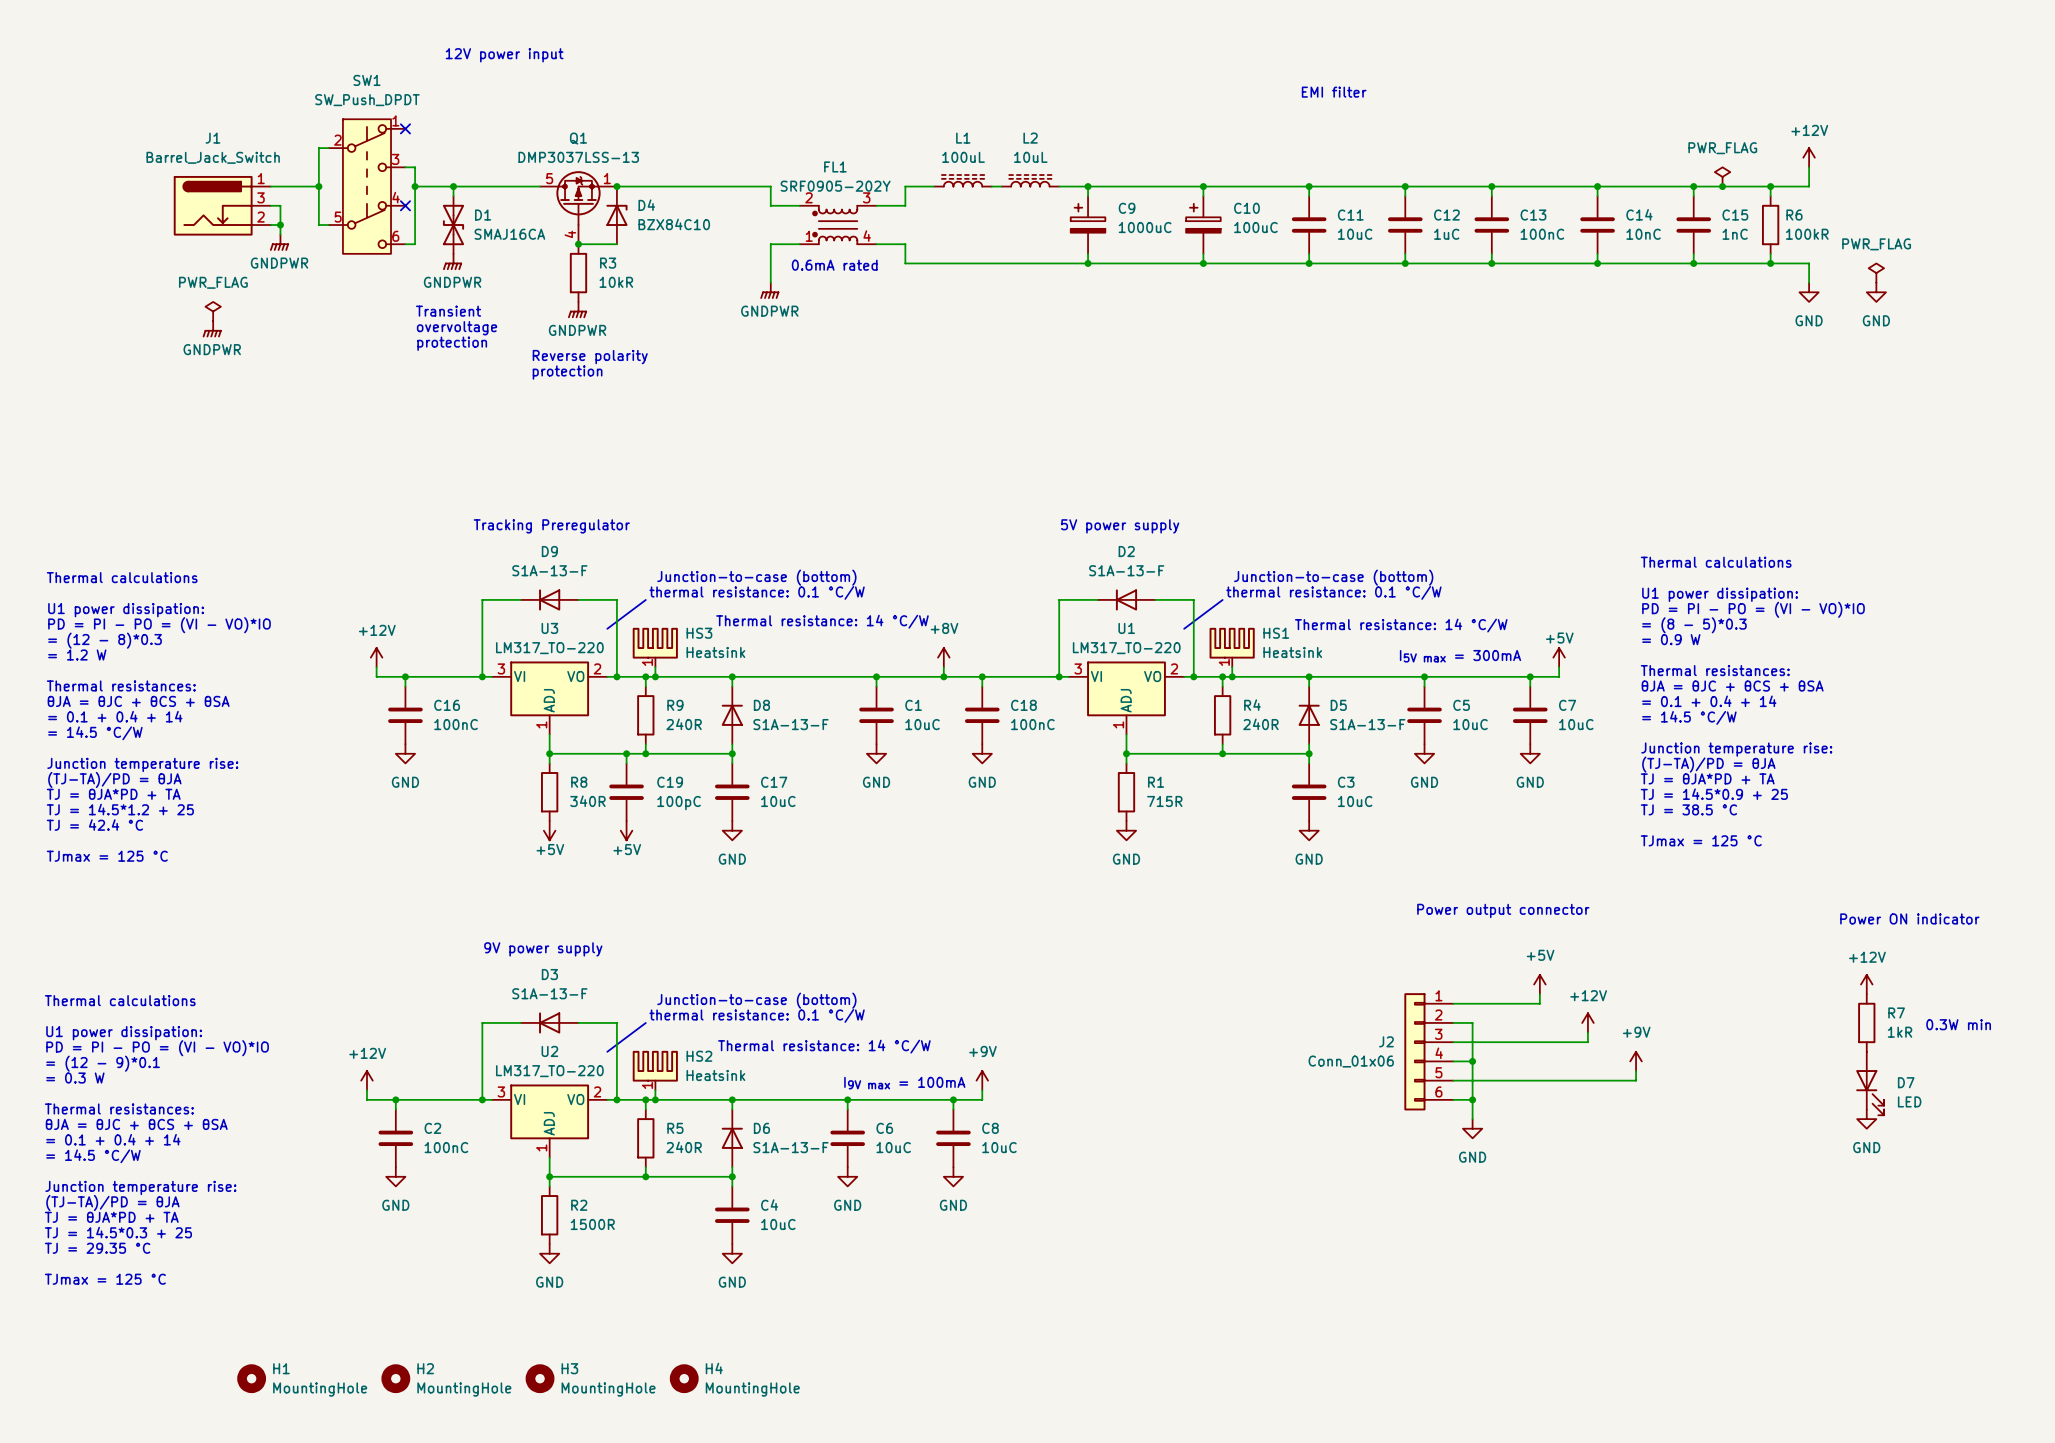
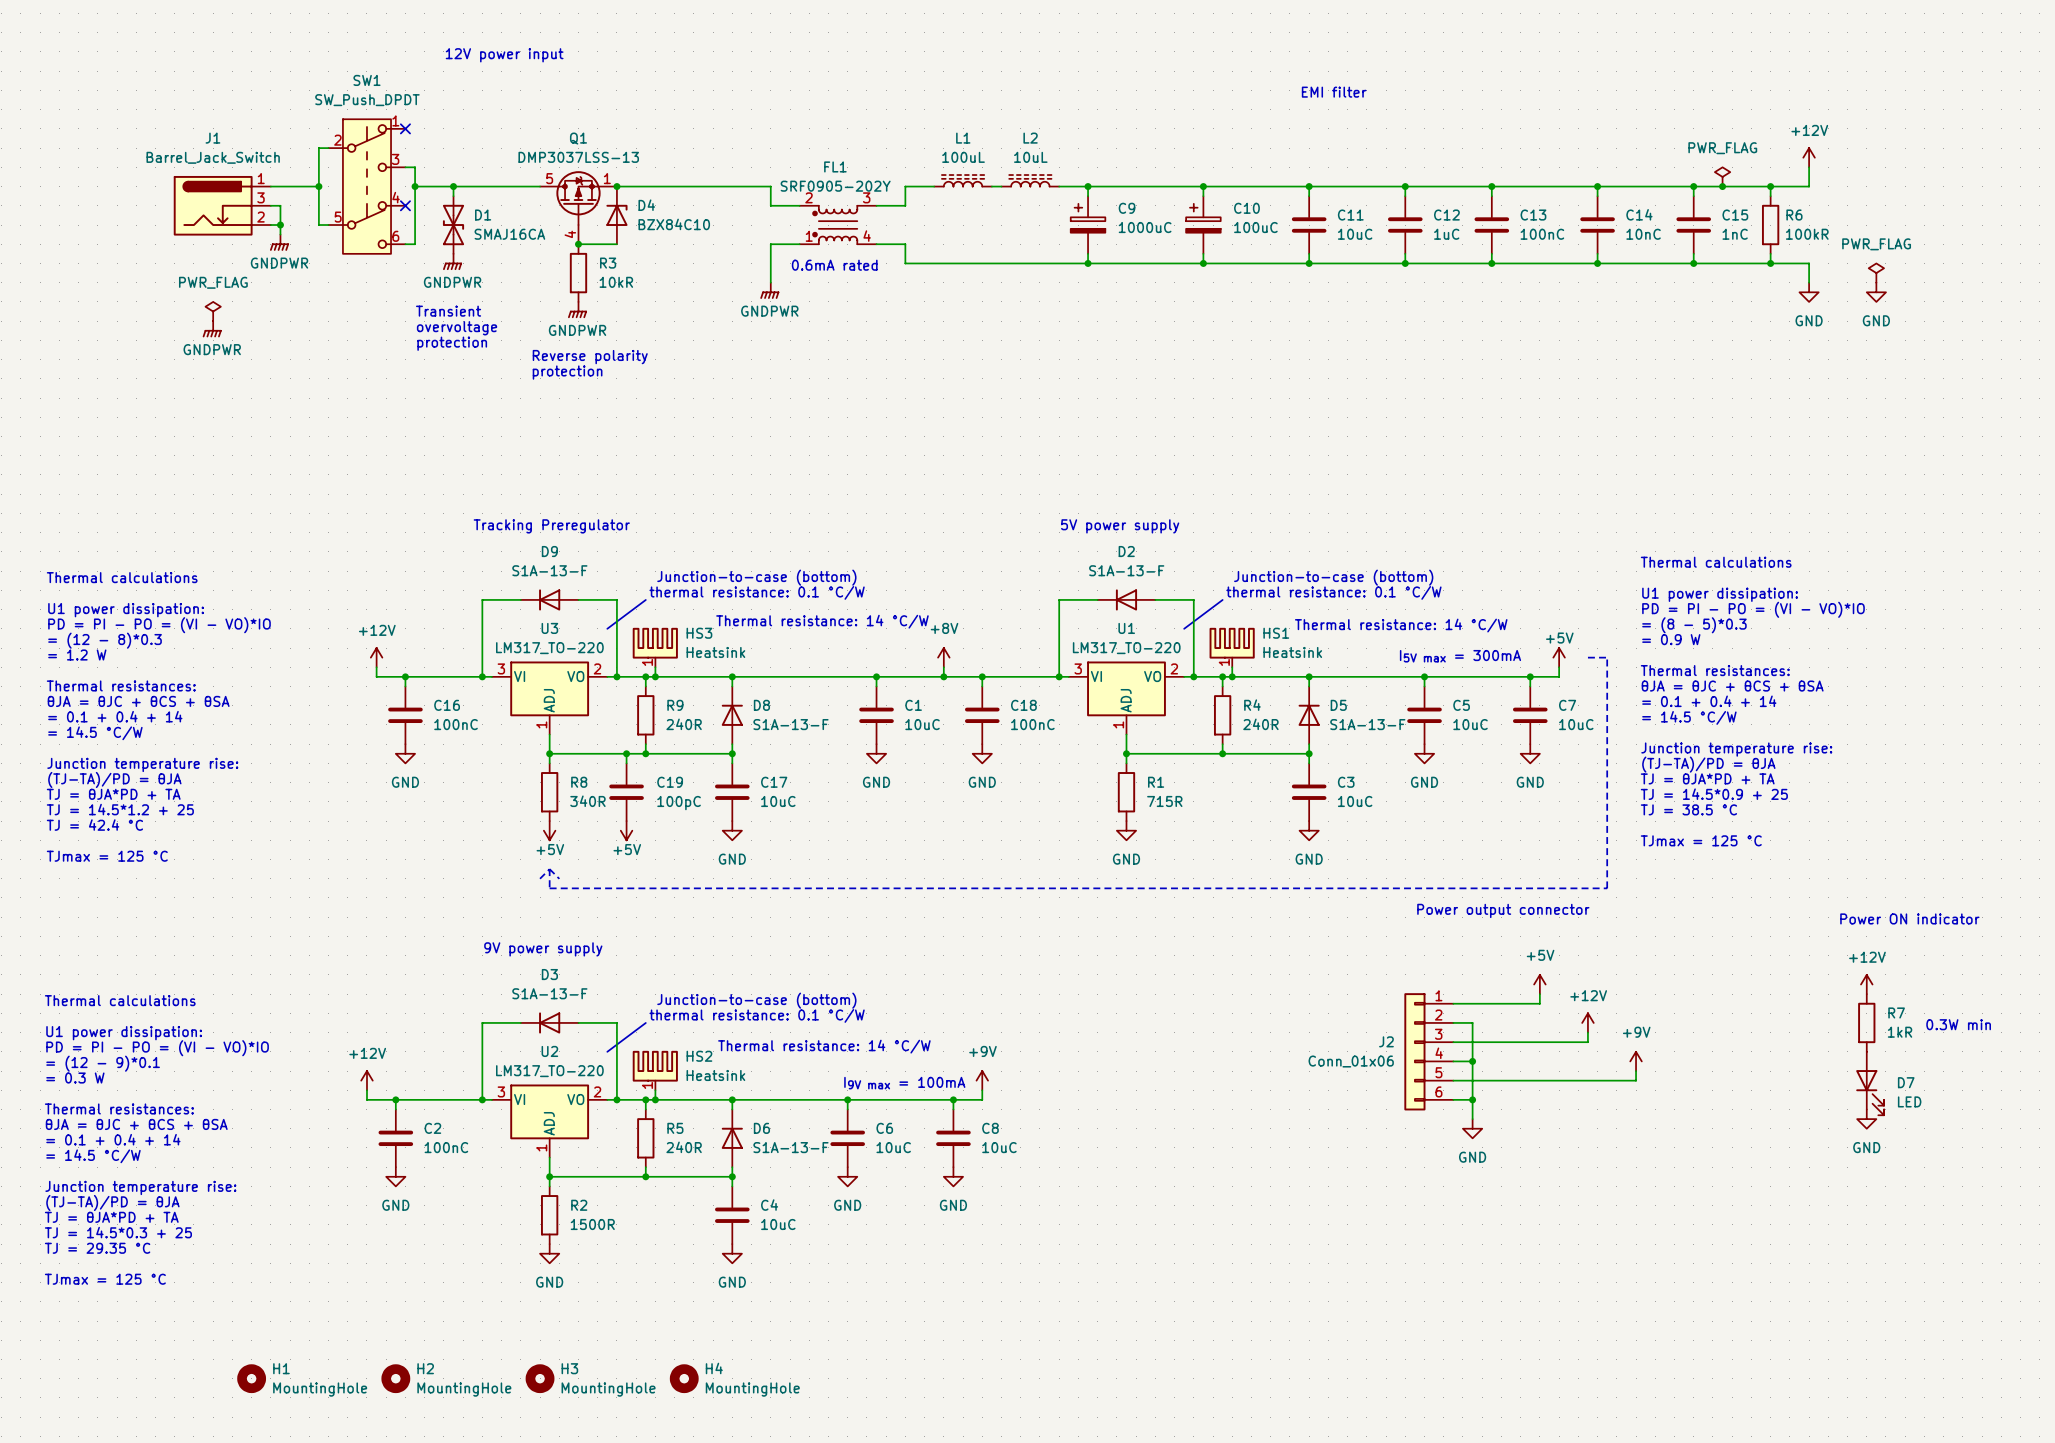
line: none -> (1587, 657) (1607, 657) (1607, 888) (549, 888) (549, 869)
line: none -> (549, 869) (559, 878)
line: none -> (549, 869) (540, 878)

